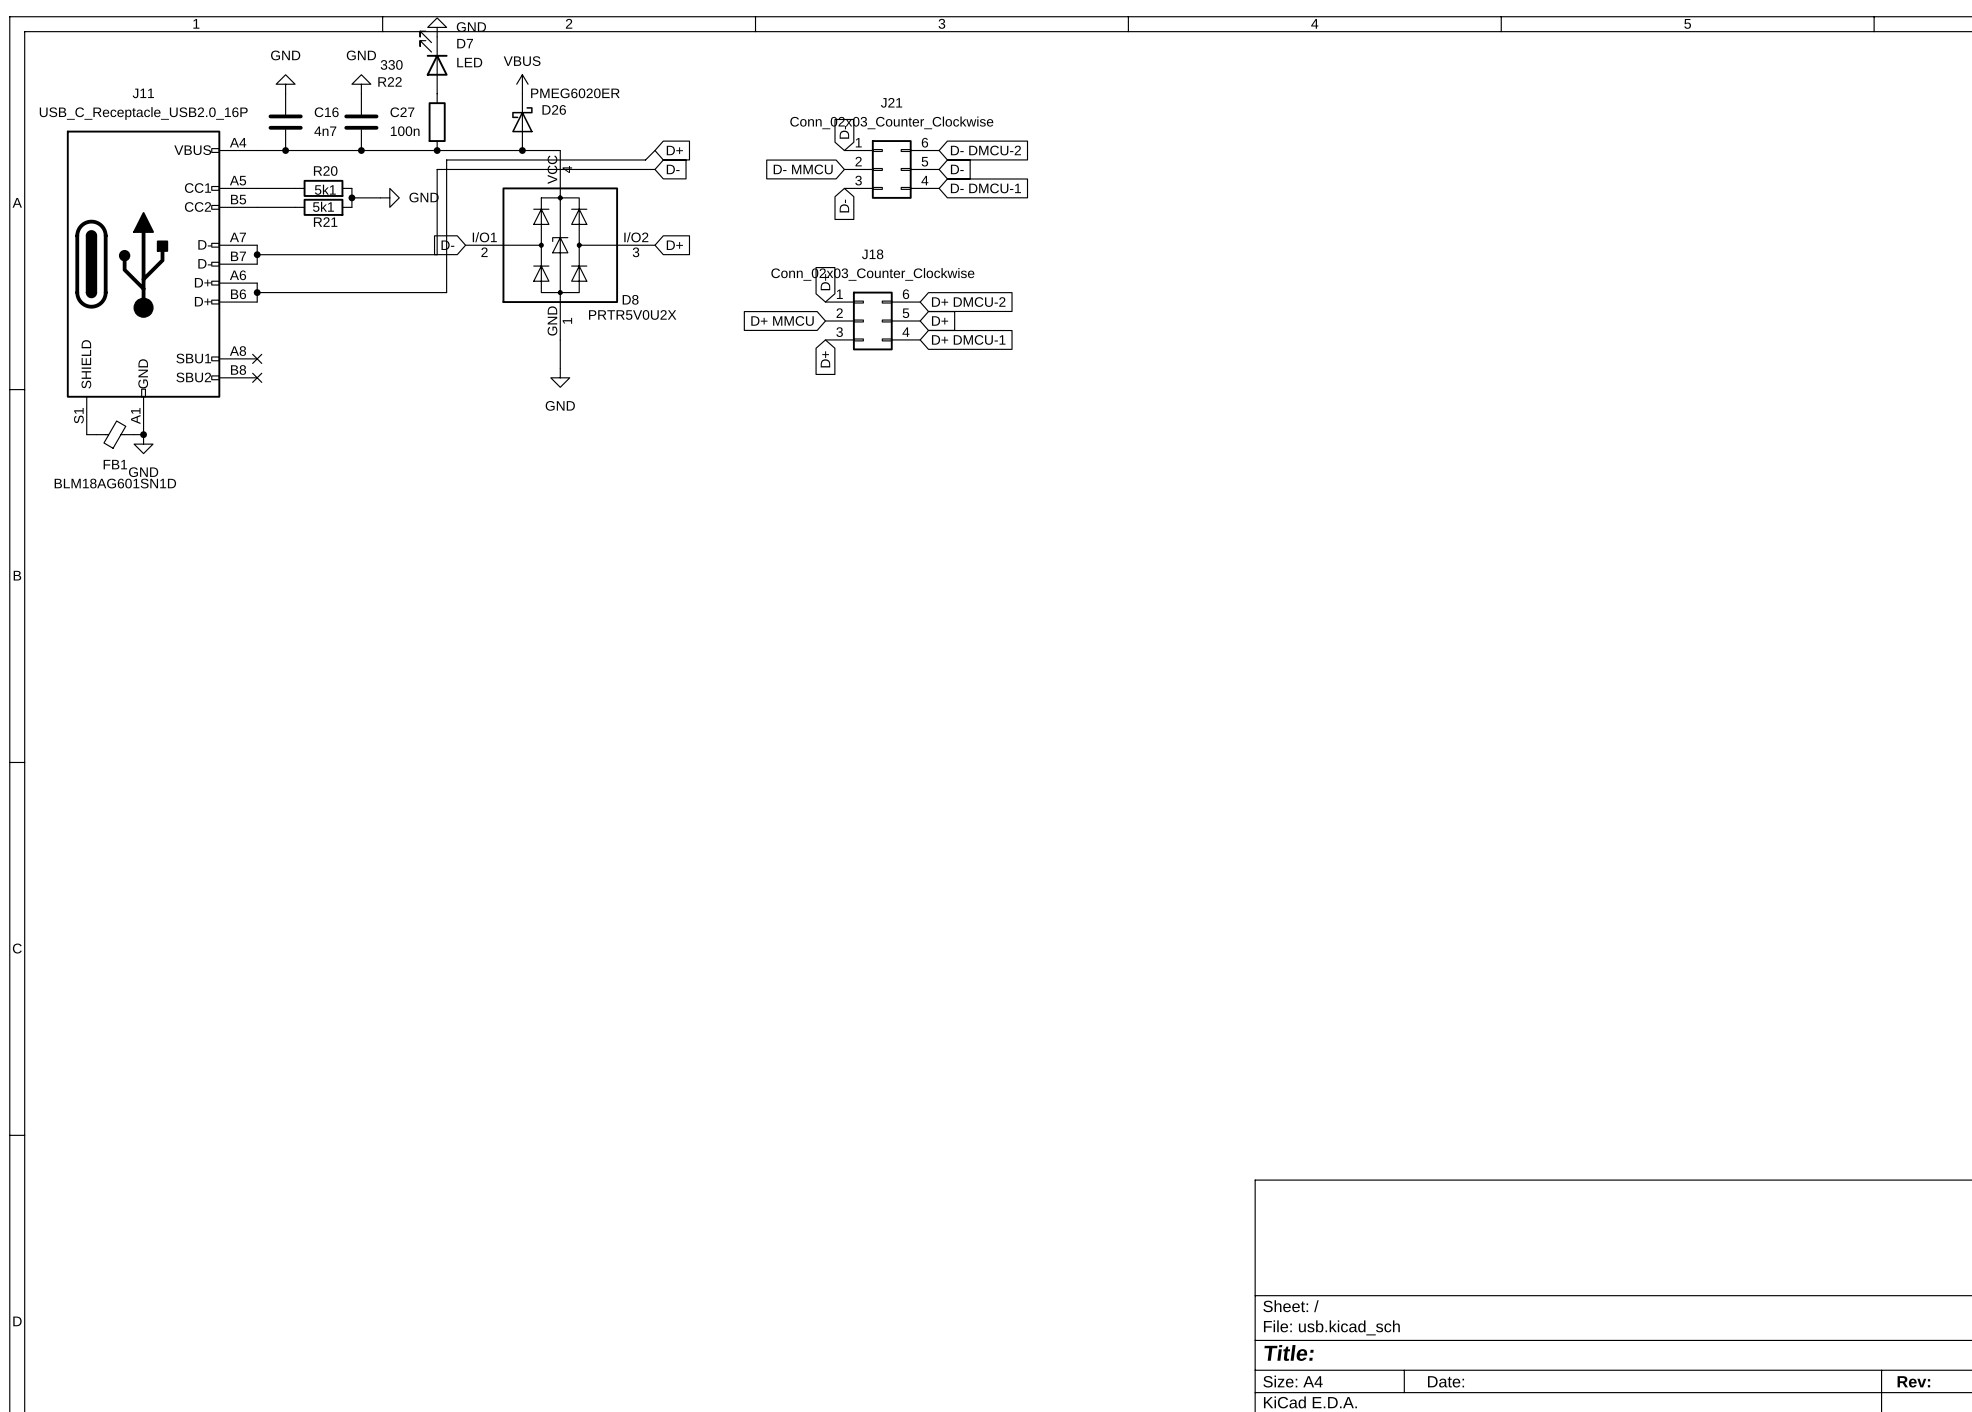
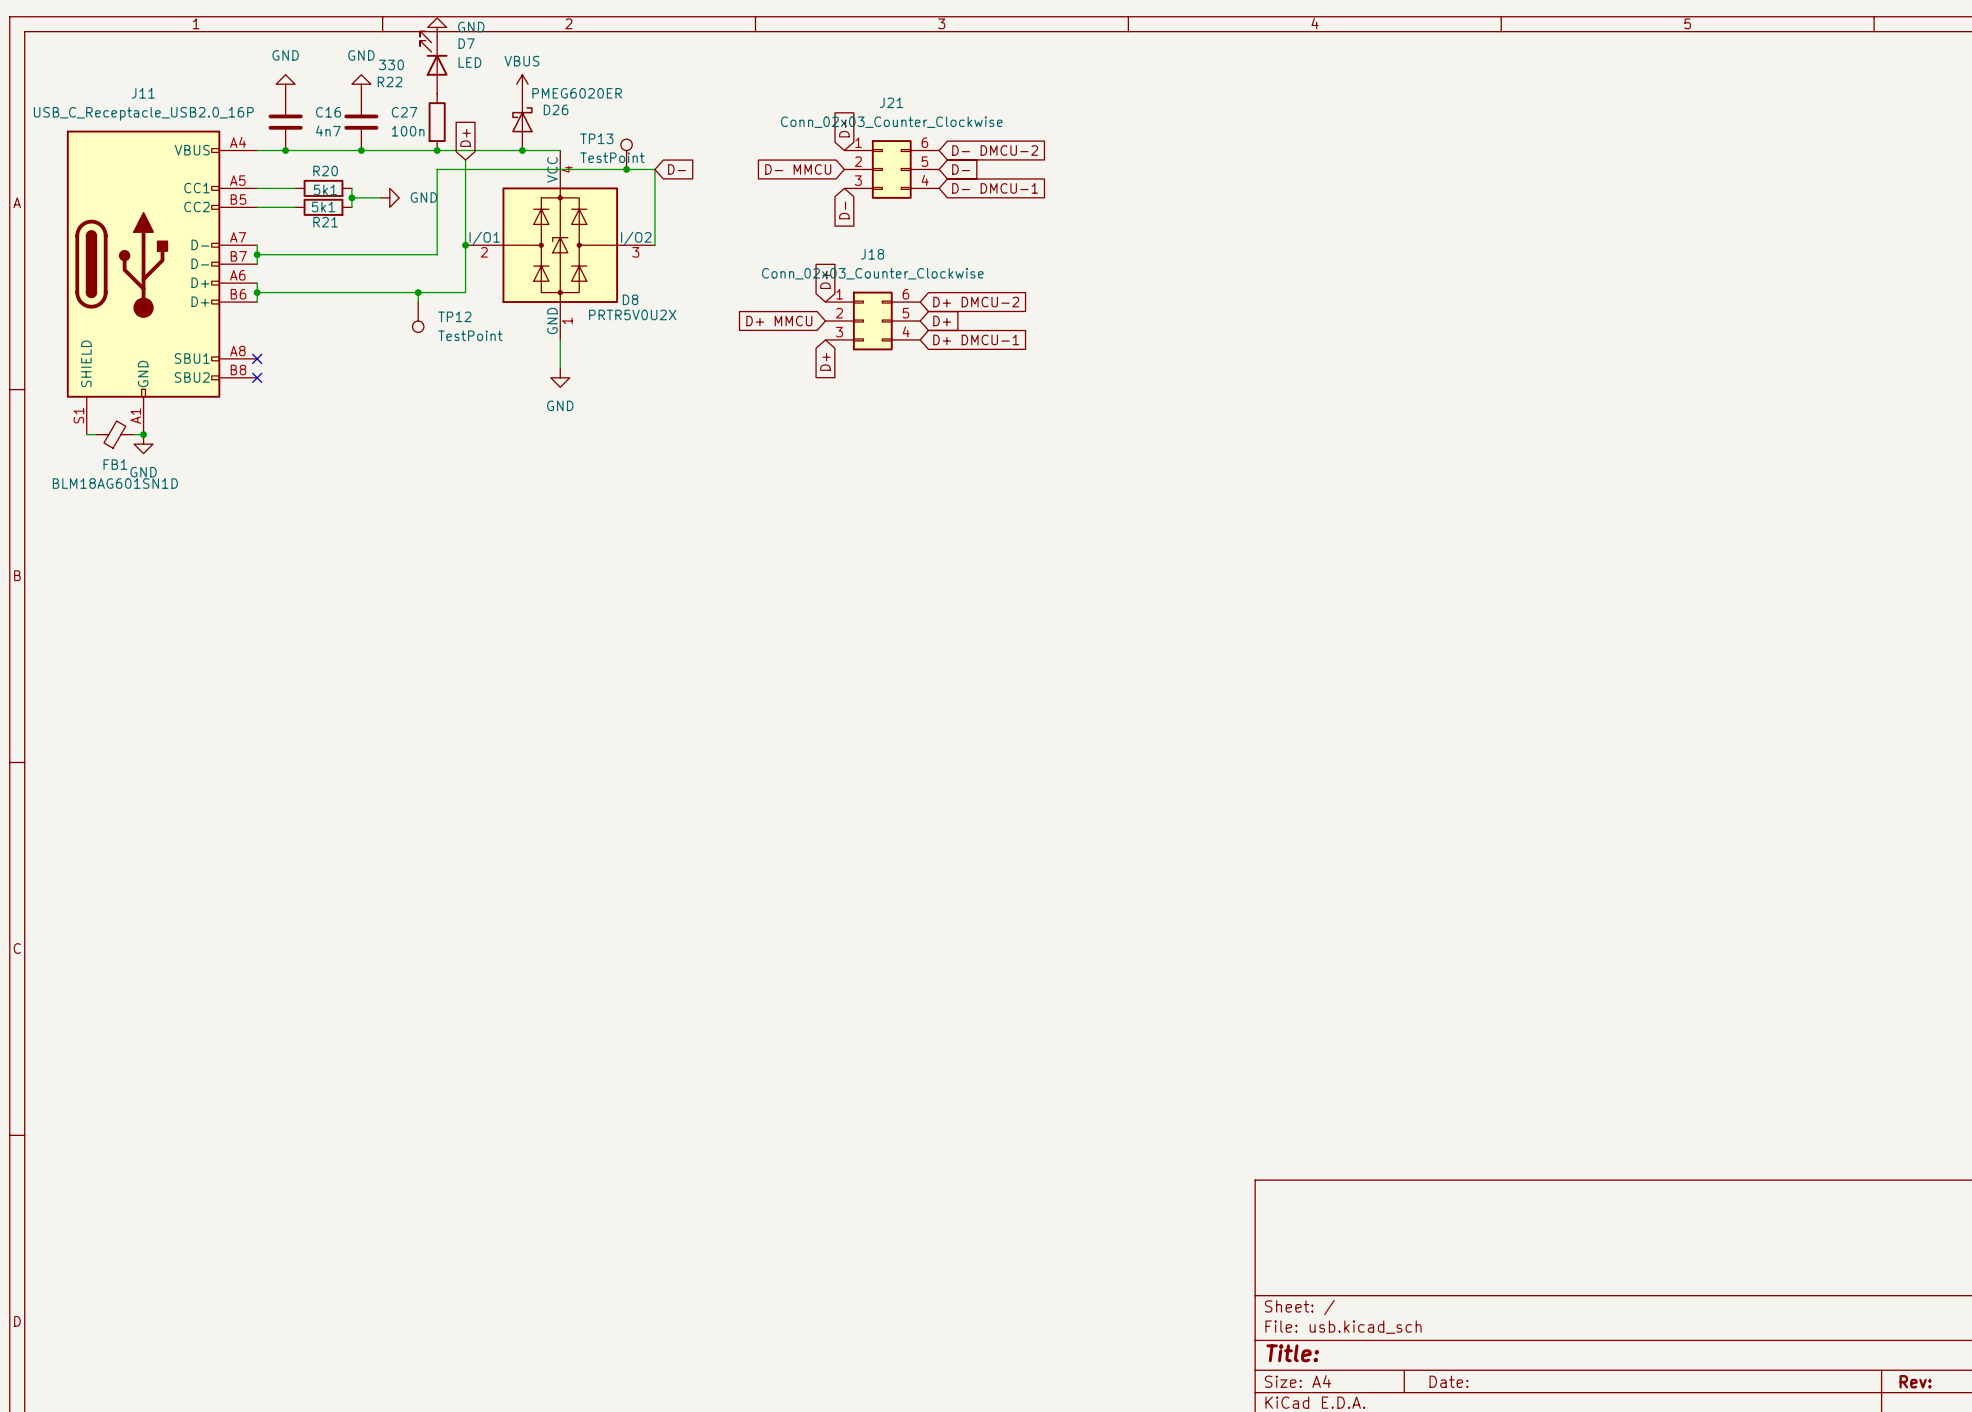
global label: none -> D+ (465, 137)
wire: (654, 150) (645, 159) (446, 159) (446, 292) -> (465, 159) (465, 292) (446, 292)
global label: D+ (674, 150) -> none
TP13: none -> TestPoint (626, 154)
junction: none -> (626, 169)
wire: none -> (654, 169) (654, 245)
global label: D- (447, 245) -> none
junction: none -> (465, 245)
global label: D+ (674, 245) -> none
wire: none -> (418, 292) (418, 302)
junction: none -> (418, 292)
TP12: none -> TestPoint (418, 317)

